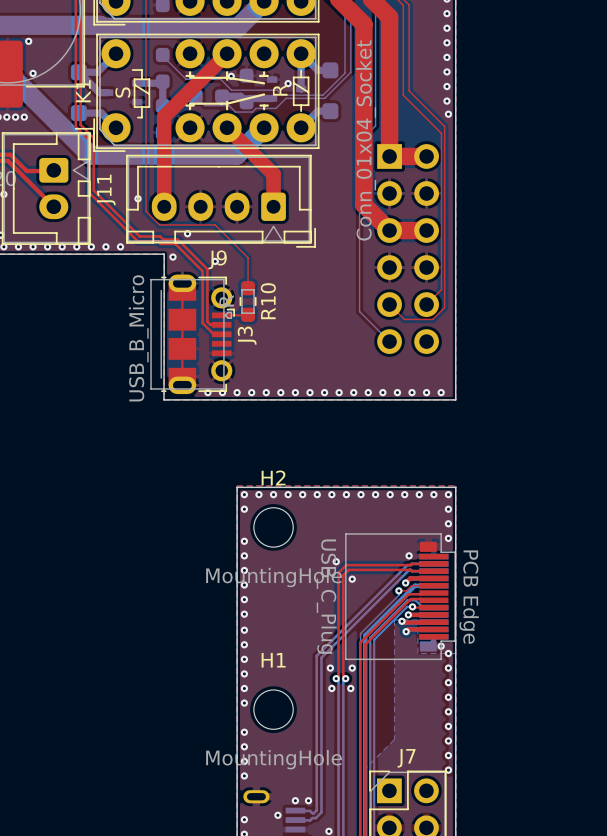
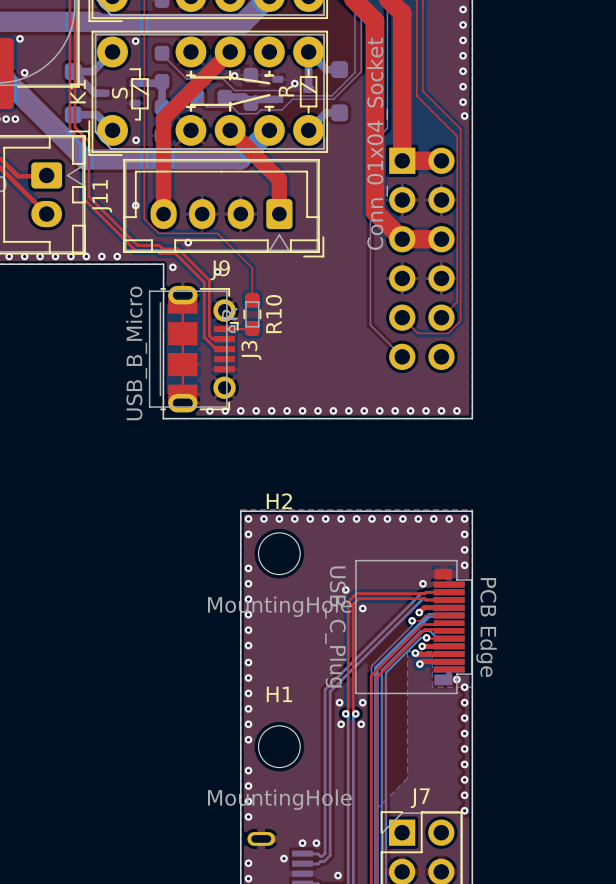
via: none -> (135, 41)
via: none -> (136, 140)

